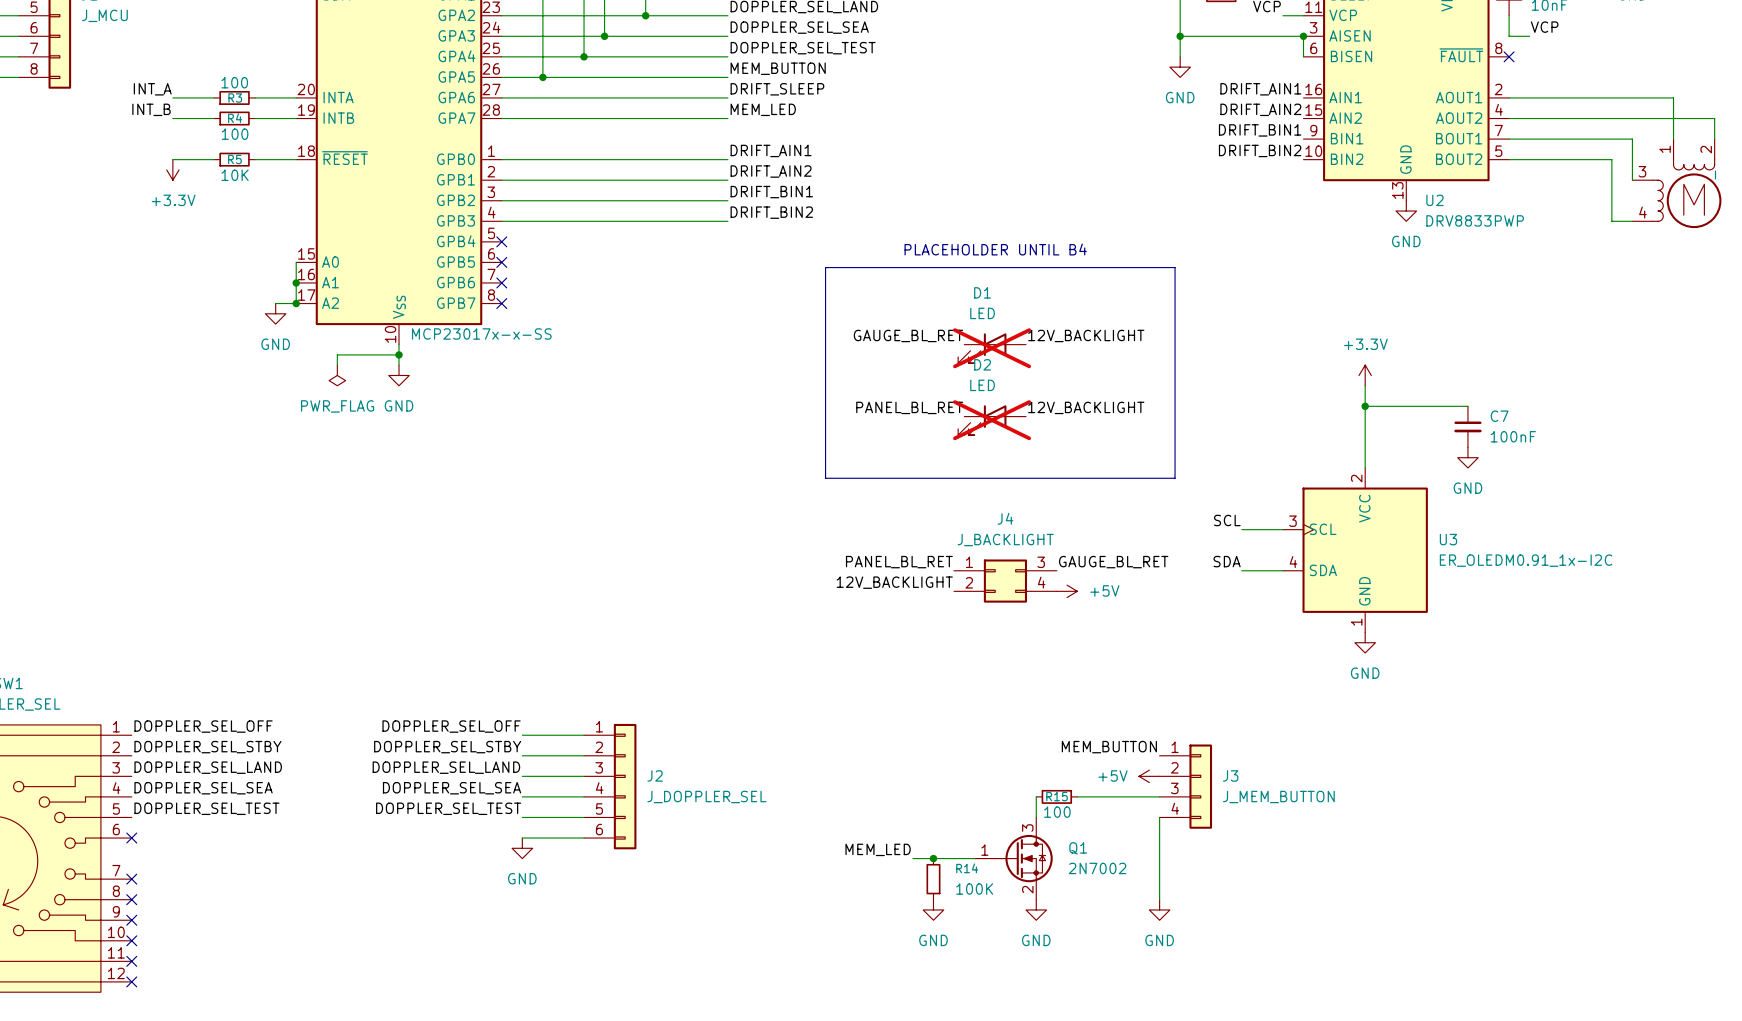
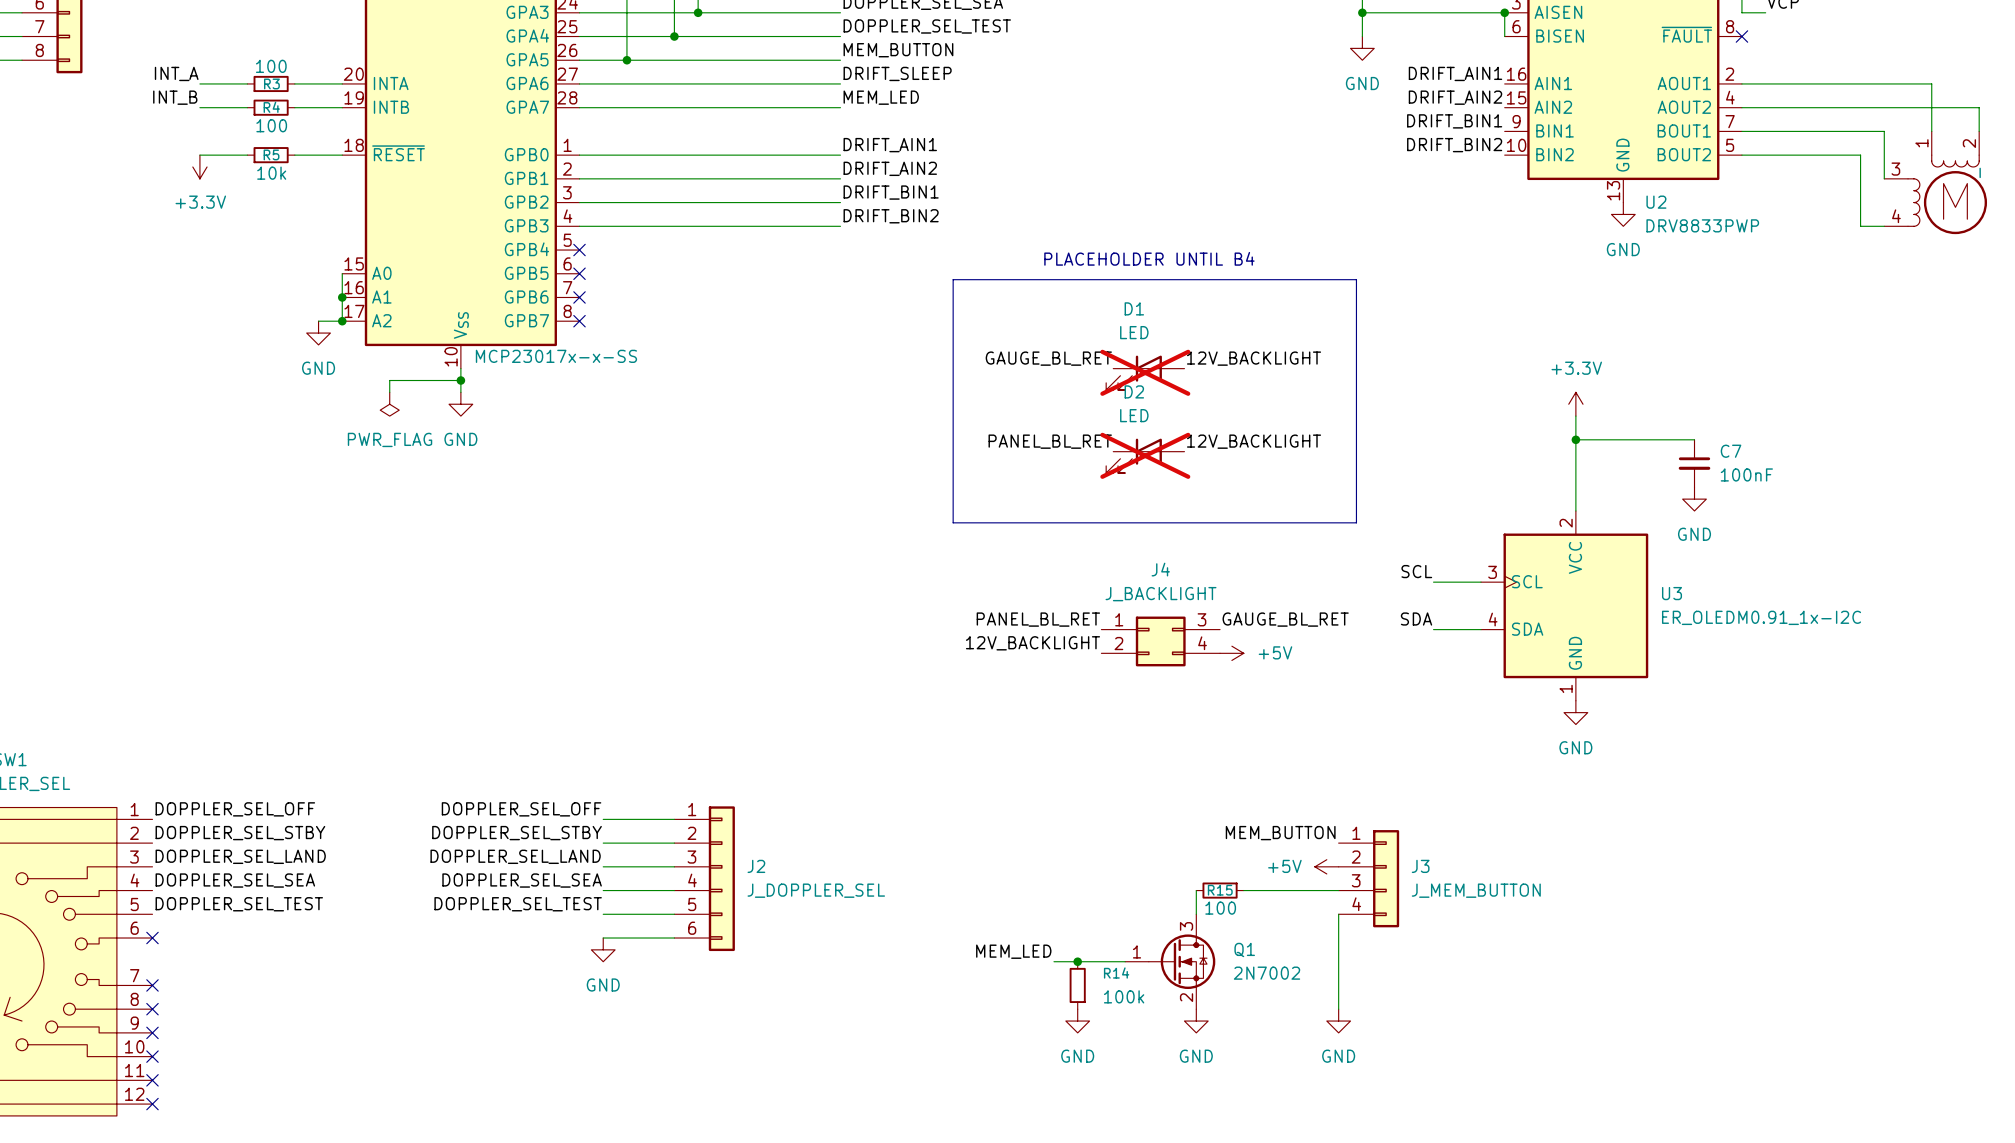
R5 value: 10K (235, 175) -> 10k (271, 173)
R14 value: 100K (974, 889) -> 100k (1124, 996)

